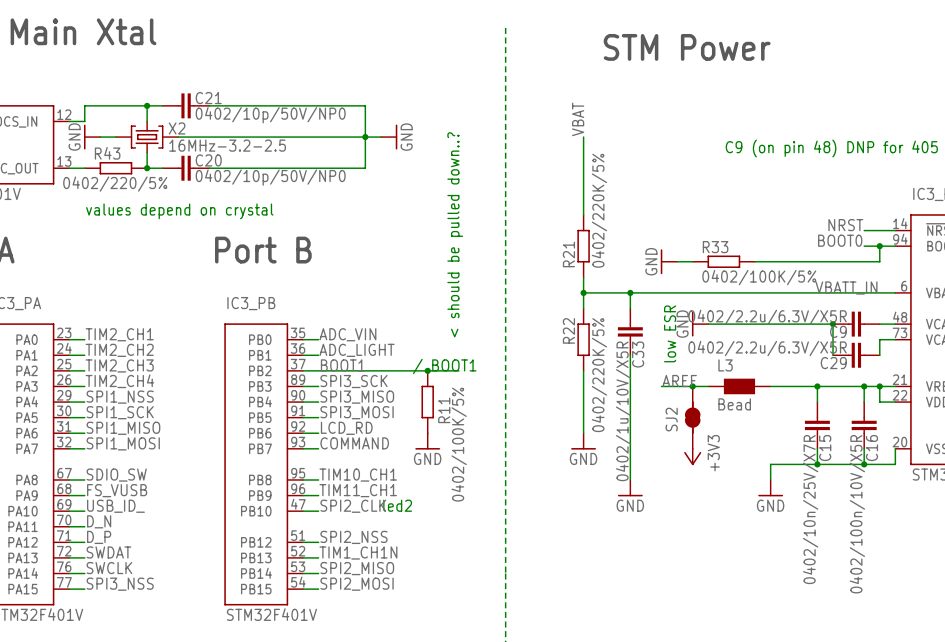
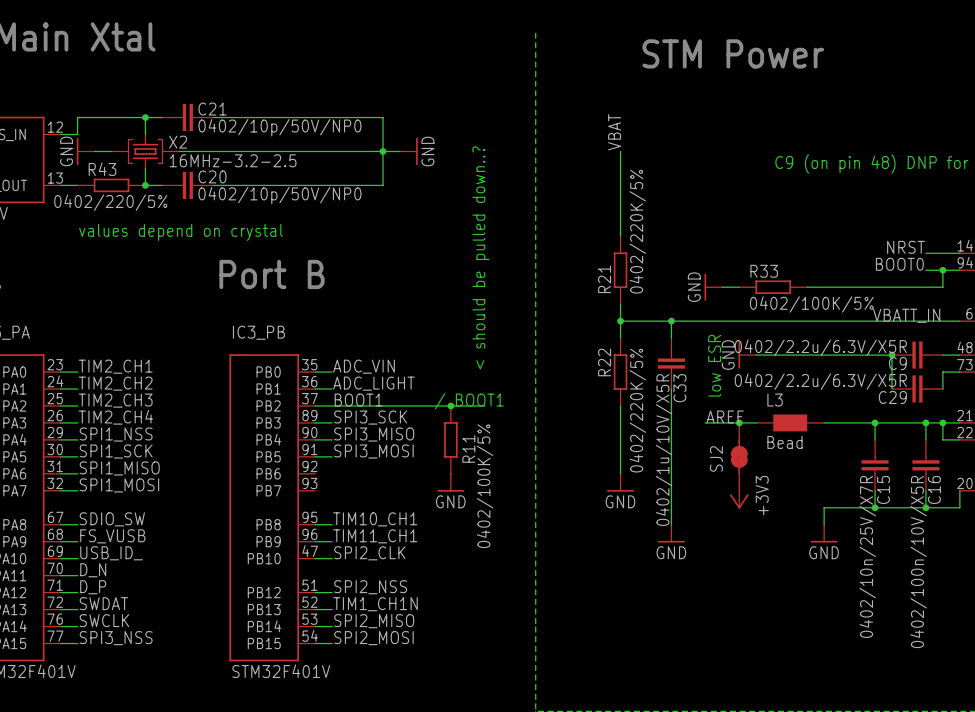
label: LCD_RD (346, 428) -> none
wire: (303, 433) (318, 433) -> none
label: COMMAND (354, 443) -> none
wire: (303, 448) (318, 448) -> none
text: led2 (397, 505) -> none

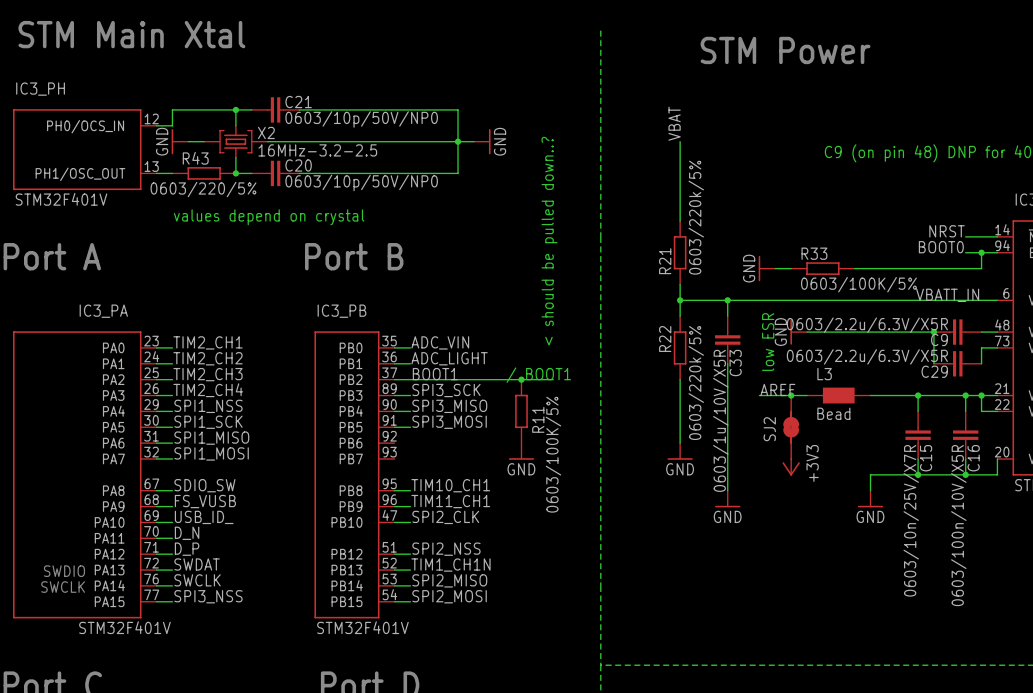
C21 value: 0402/10p/50V/NP0 (279, 127) -> 0603/10p/50V/NP0 (361, 119)
C20 value: 0402/10p/50V/NP0 (279, 195) -> 0603/10p/50V/NP0 (361, 182)
R43 value: 0402/220/5% (110, 202) -> 0603/220/5% (203, 189)
R21 value: 0402/220K/5% (637, 231) -> 0603/220k/5% (696, 217)
R33 value: 0402/100K/5% (811, 304) -> 0603/100K/5% (858, 284)
C9 value: 0402/2.2u/6.3V/X5R (820, 347) -> 0603/2.2u/6.3V/X5R (867, 325)
C29 value: 0402/2.2u/6.3V/X5R (820, 381) -> 0603/2.2u/6.3V/X5R (867, 356)
R22 value: 0402/220K/5% (637, 410) -> 0603/220k/5% (696, 383)
C33 value: 0402/1u/10V/X5R (664, 450) -> 0603/1u/10V/X5R (720, 420)
R11 value: 0402/100K/5% (485, 486) -> 0603/100K/5% (553, 454)
C15 value: 0402/10n/25V/X7R (867, 556) -> 0603/10n/25V/X7R (911, 520)
C16 value: 0402/100n/10V/X5R (918, 562) -> 0603/100n/10V/X5R (958, 525)

